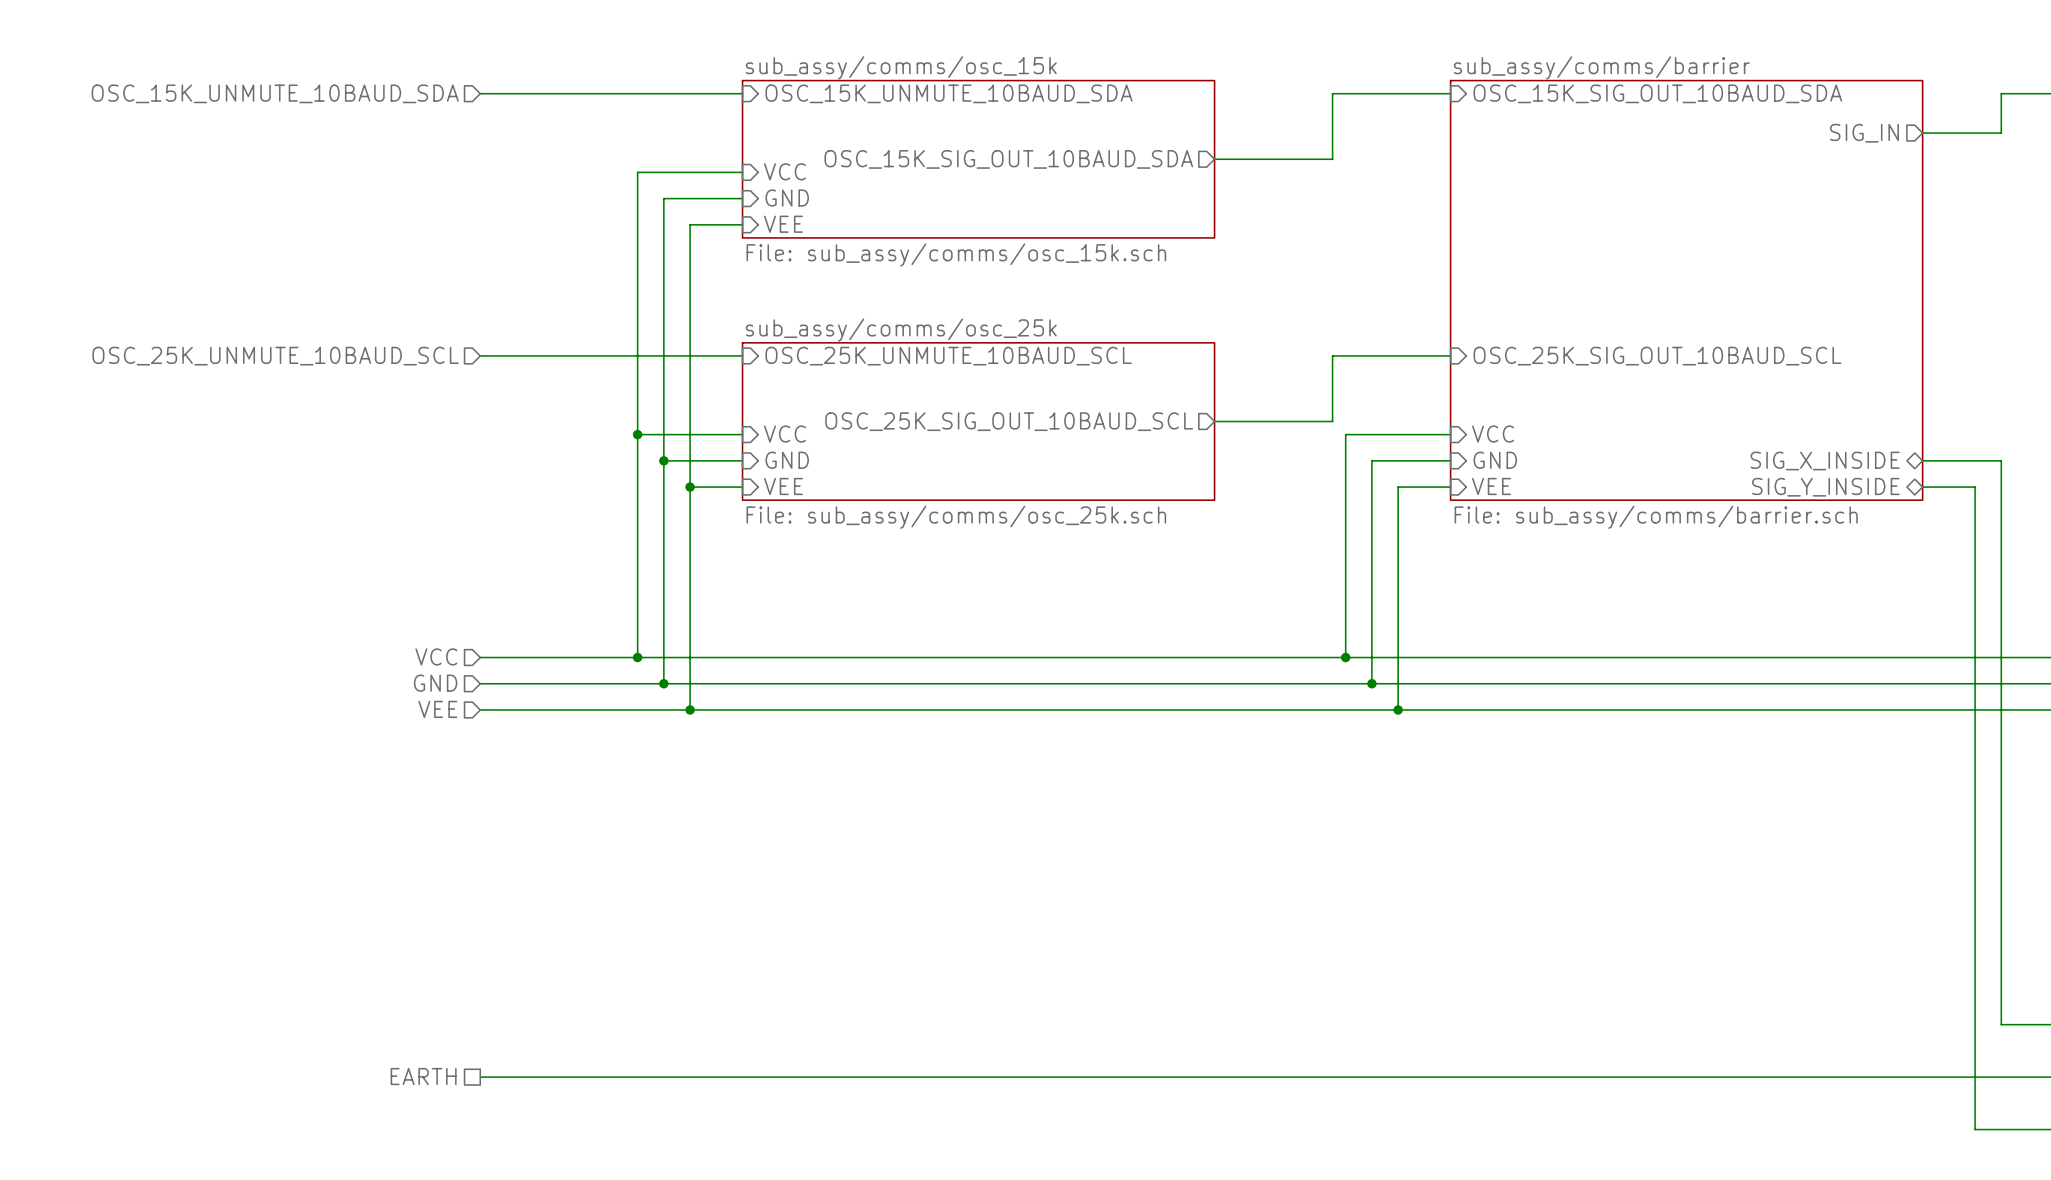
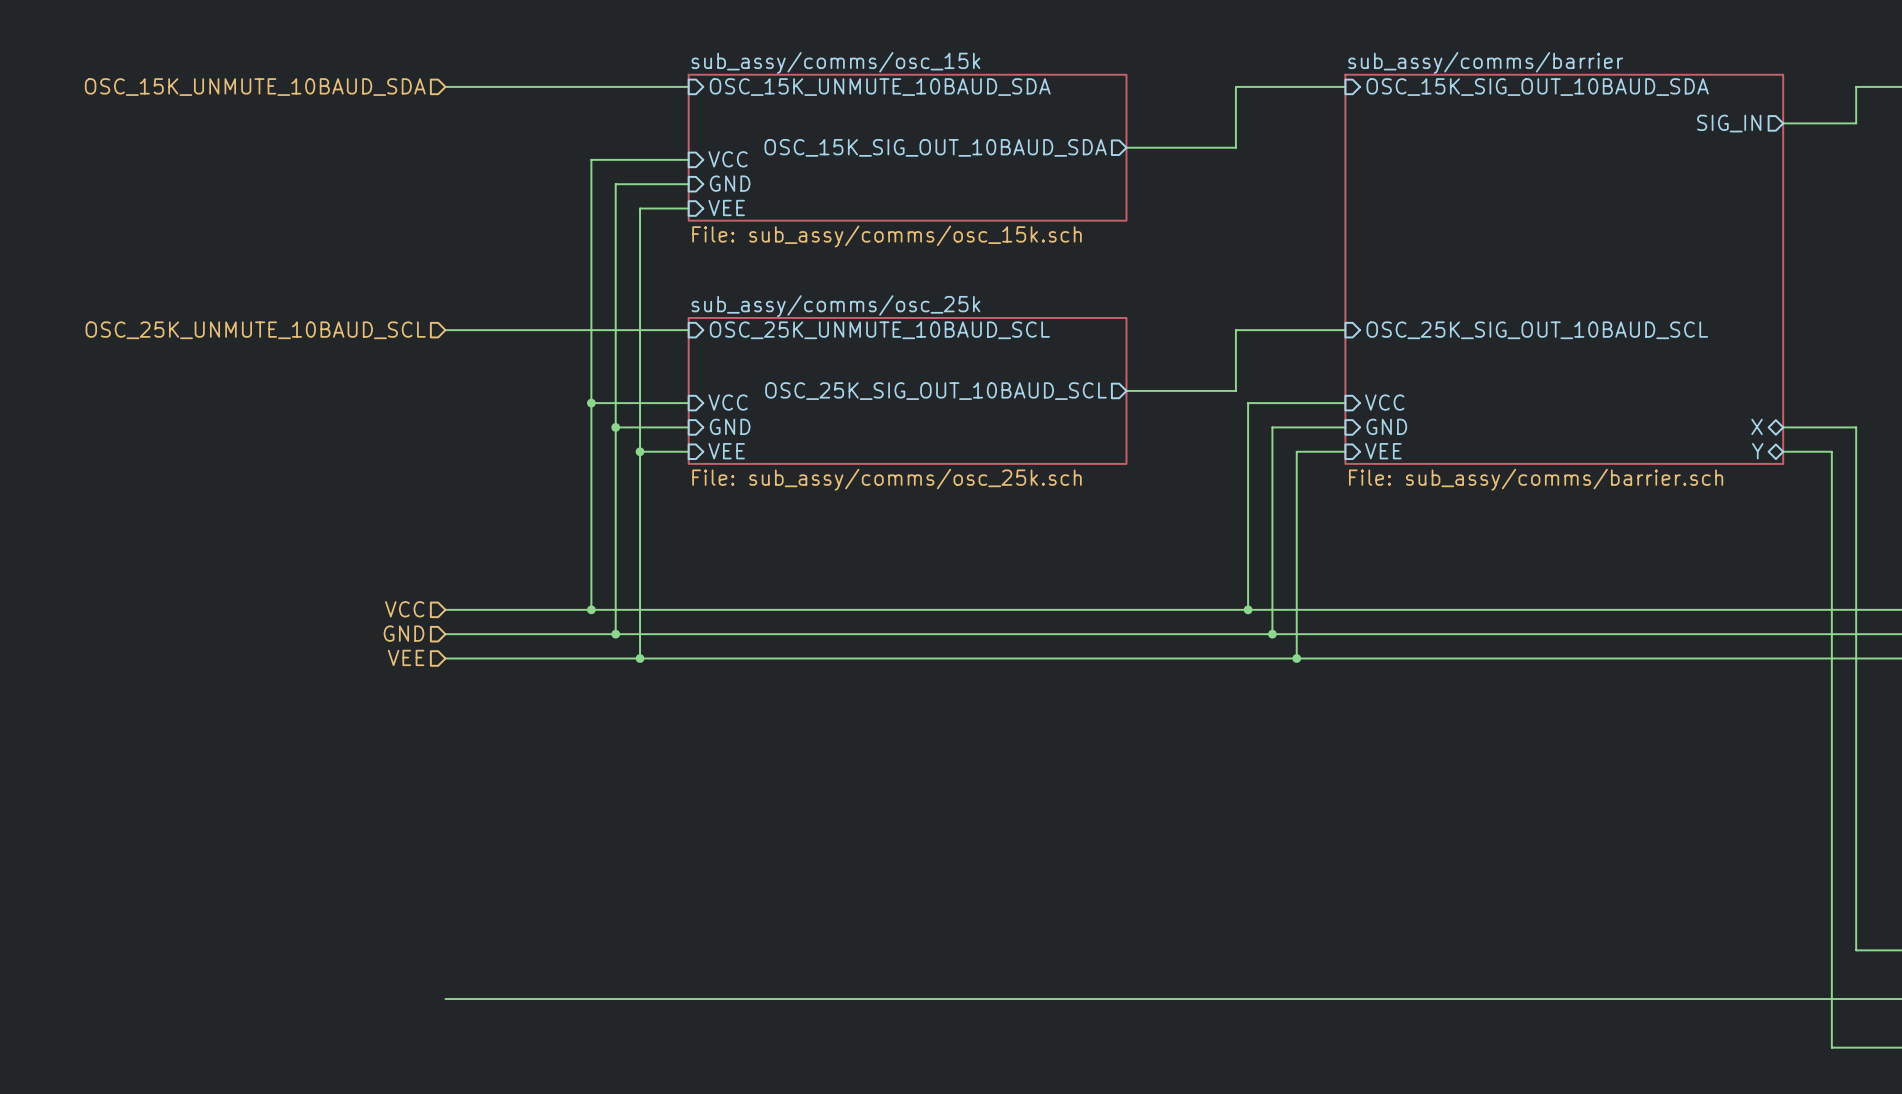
sheet pin: SIG_X_INSIDE (1825, 461) -> X (1757, 426)
sheet pin: SIG_Y_INSIDE (1825, 487) -> Y (1757, 451)
hierarchical label: EARTH (423, 1076) -> none

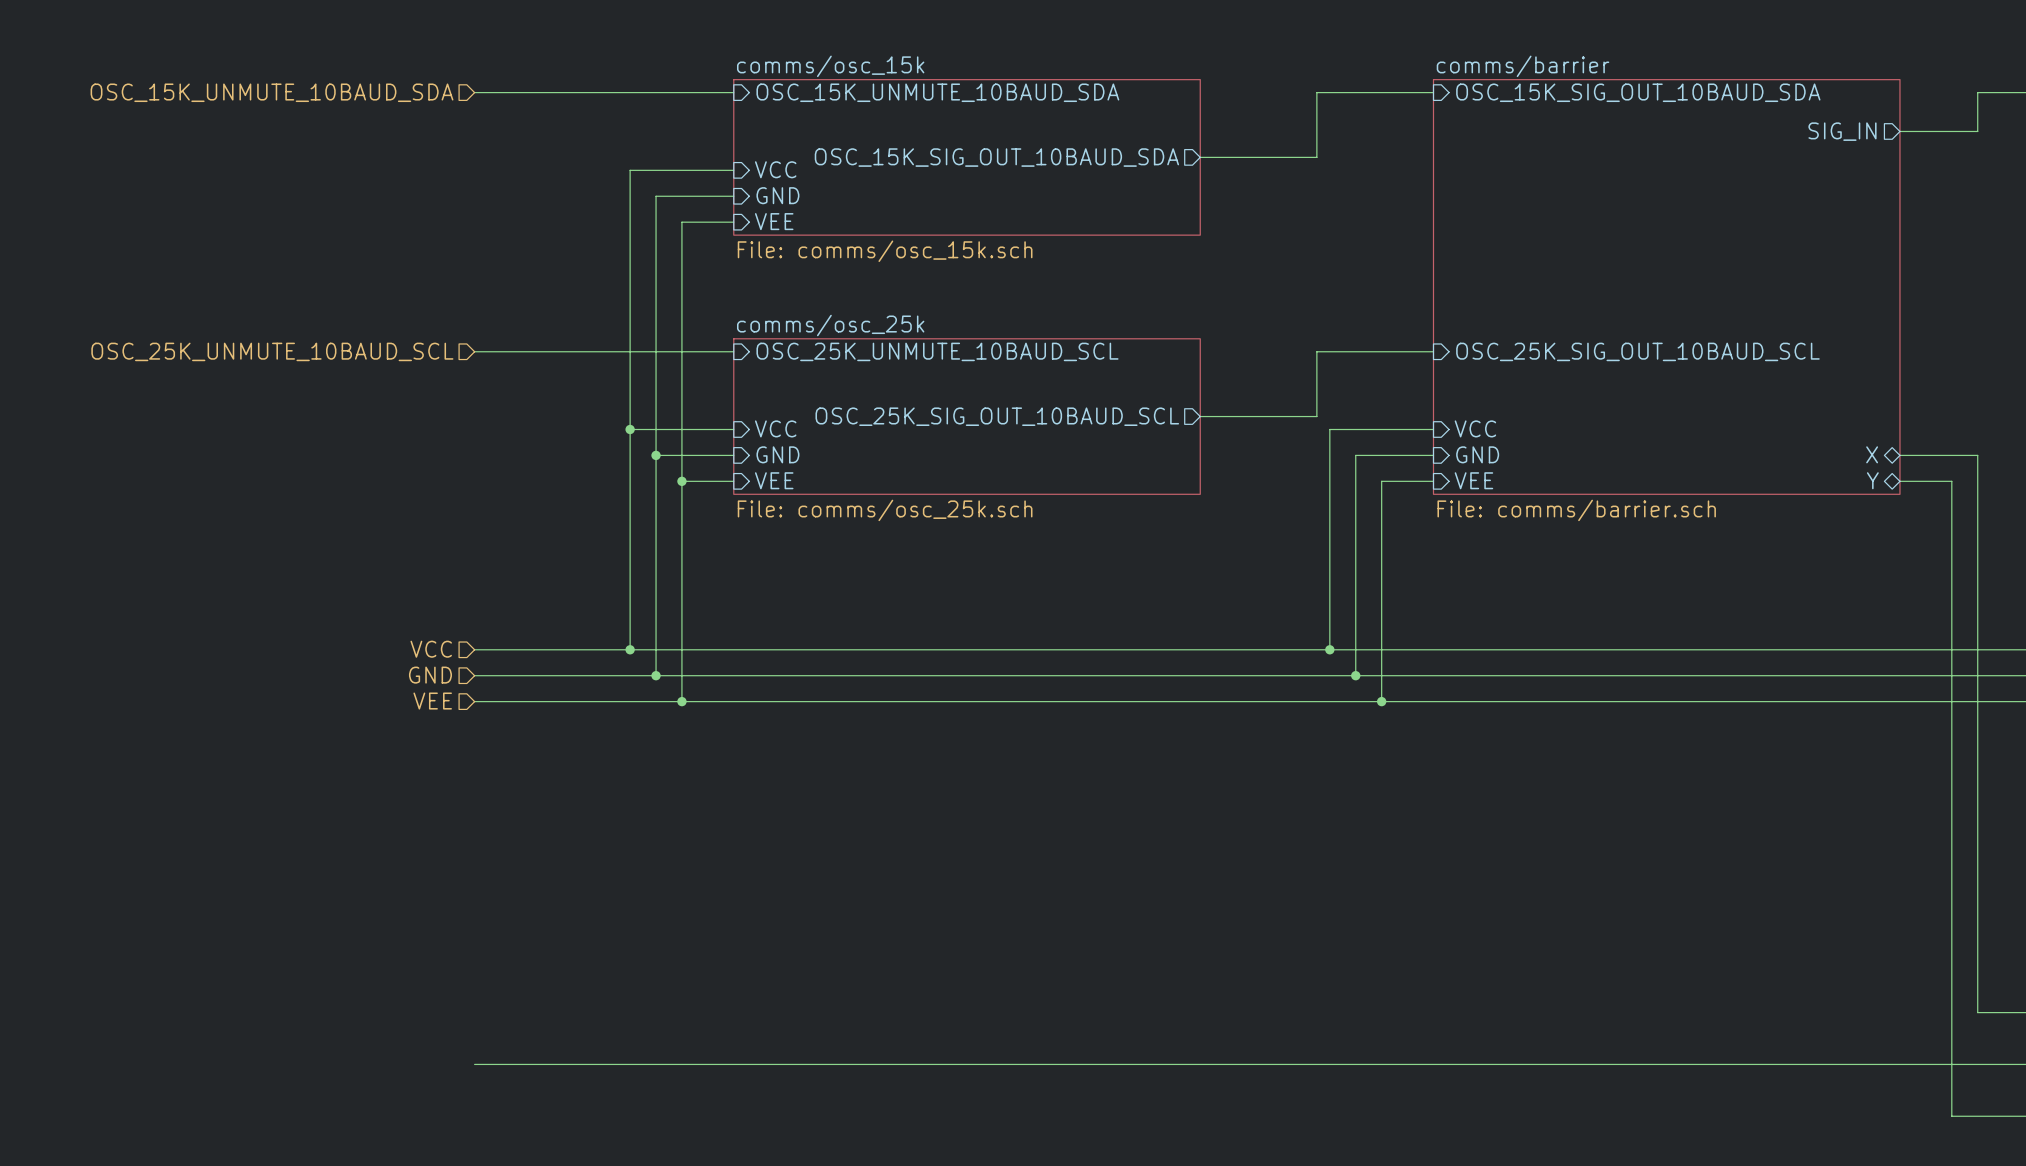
sheet sub_assy/comms/osc_15k name: sub_assy/comms/osc_15k (835, 62) -> comms/osc_15k (830, 66)
sheet sub_assy/comms/barrier name: sub_assy/comms/barrier (1485, 62) -> comms/barrier (1523, 66)
sheet sub_assy/comms/osc_15k value: File: sub_assy/comms/osc_15k.sch (887, 236) -> File: comms/osc_15k.sch (885, 251)
sheet sub_assy/comms/osc_25k name: sub_assy/comms/osc_25k (835, 306) -> comms/osc_25k (830, 325)
sheet sub_assy/comms/osc_25k value: File: sub_assy/comms/osc_25k.sch (887, 479) -> File: comms/osc_25k.sch (885, 510)
sheet sub_assy/comms/barrier value: File: sub_assy/comms/barrier.sch (1536, 479) -> File: comms/barrier.sch (1576, 510)

